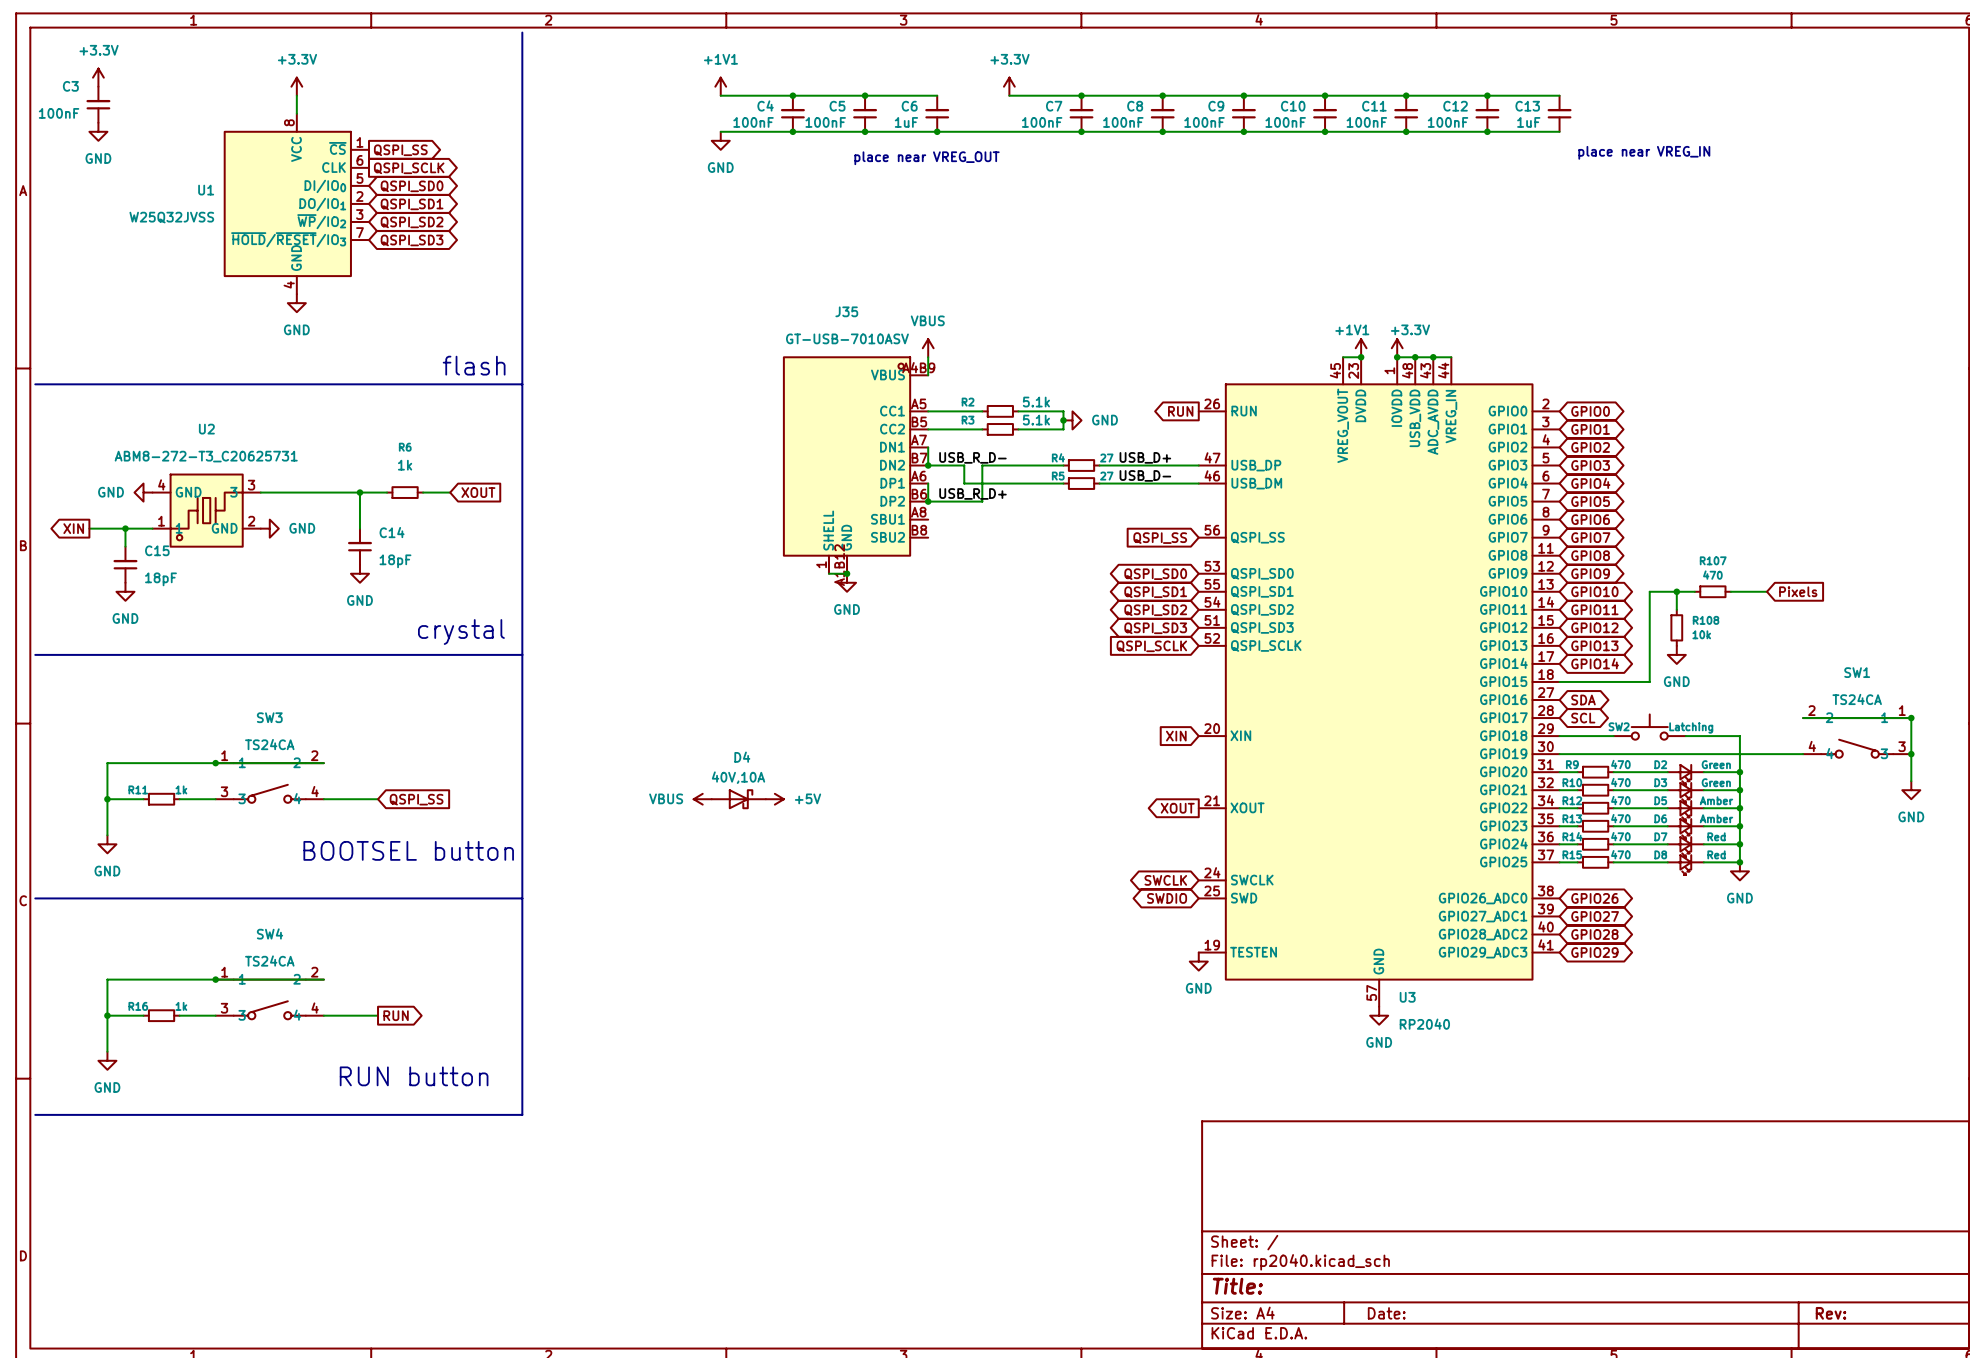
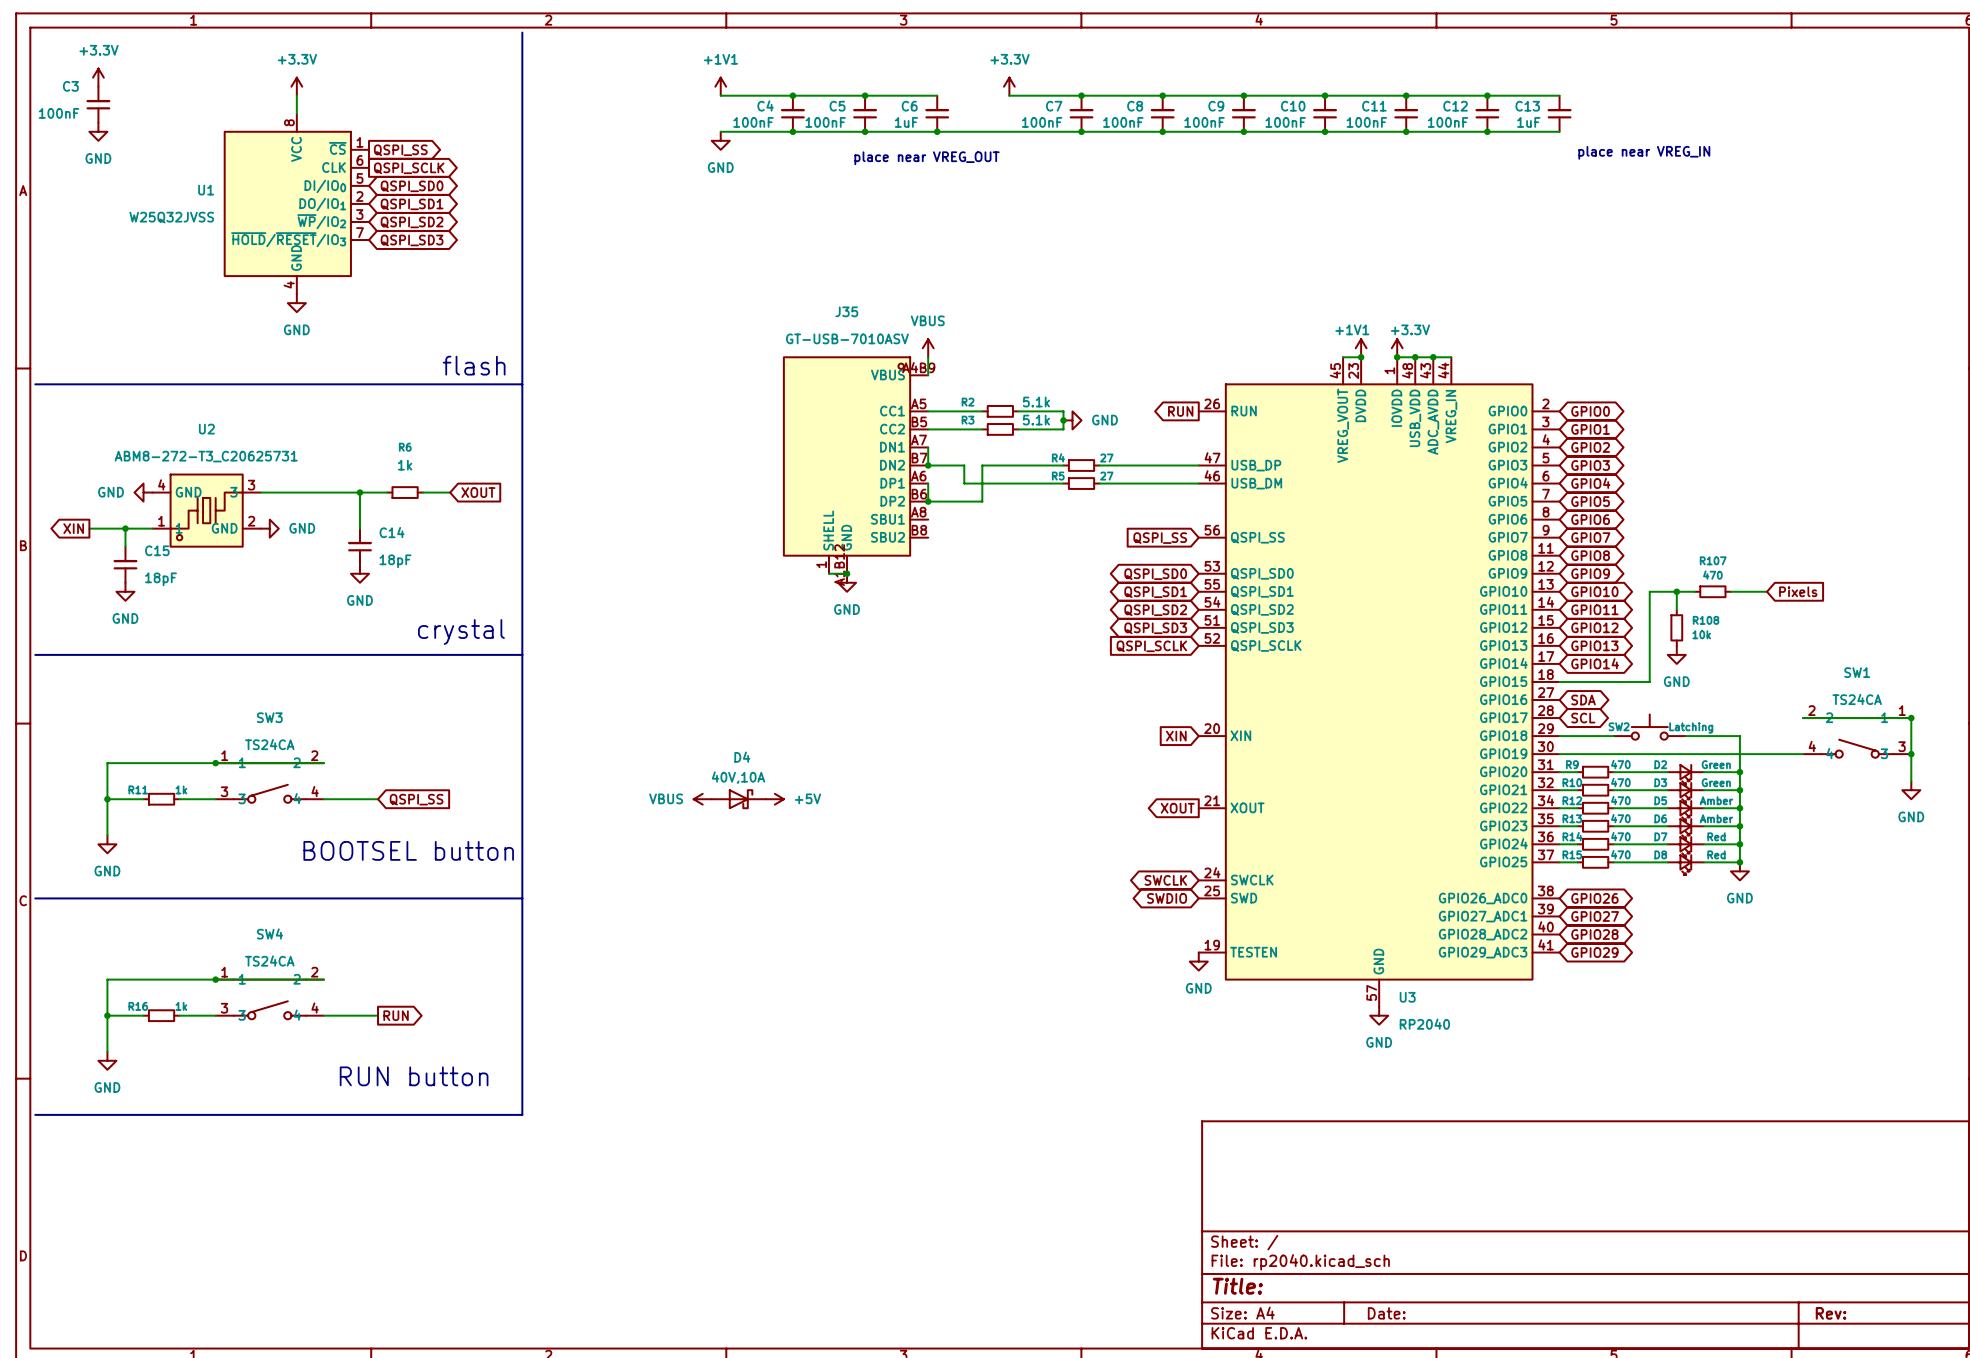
label: USB_R_D- (972, 457) -> none
label: USB_D+ (1145, 457) -> none
label: USB_D- (1145, 475) -> none
label: USB_R_D+ (972, 493) -> none

